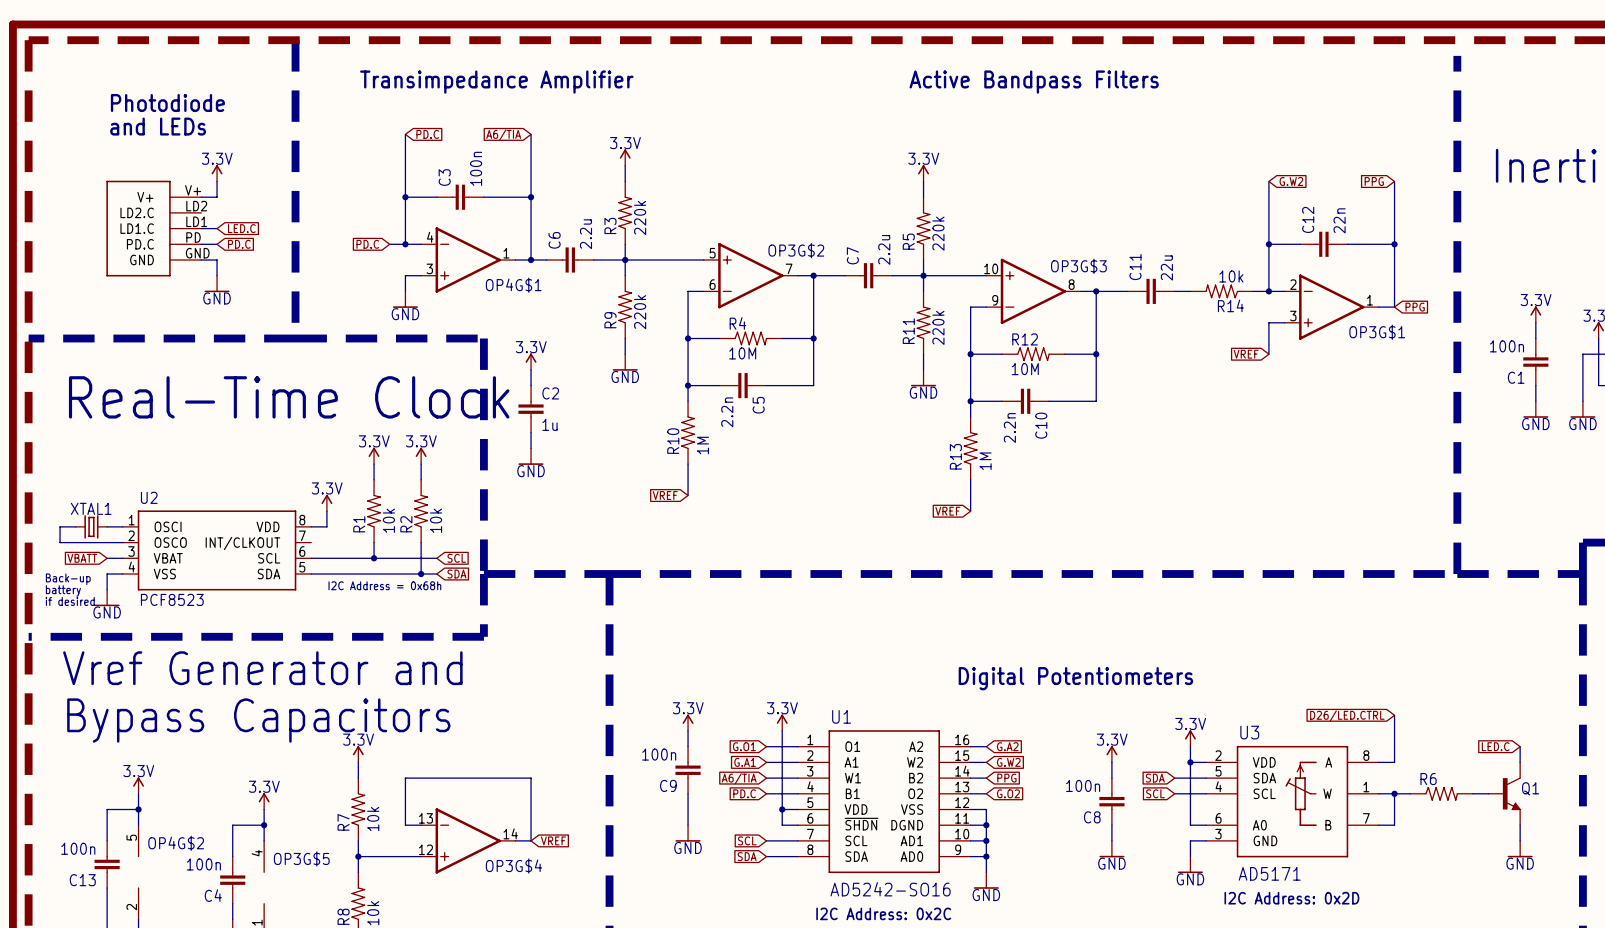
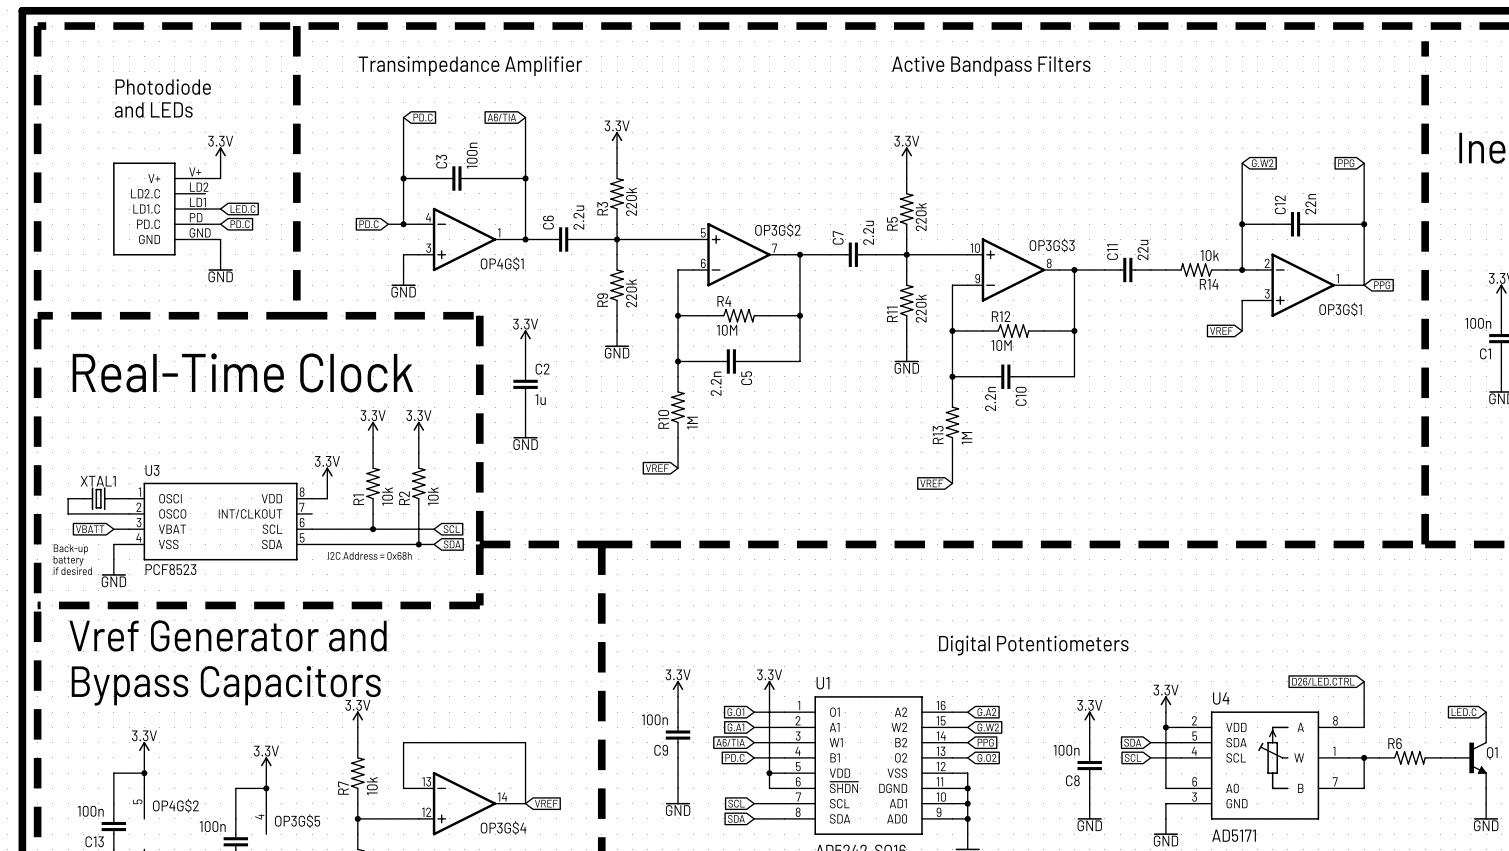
U2 name: U2 (149, 497) -> U3 (152, 470)
U3 name: U3 (1249, 732) -> U4 (1221, 698)

